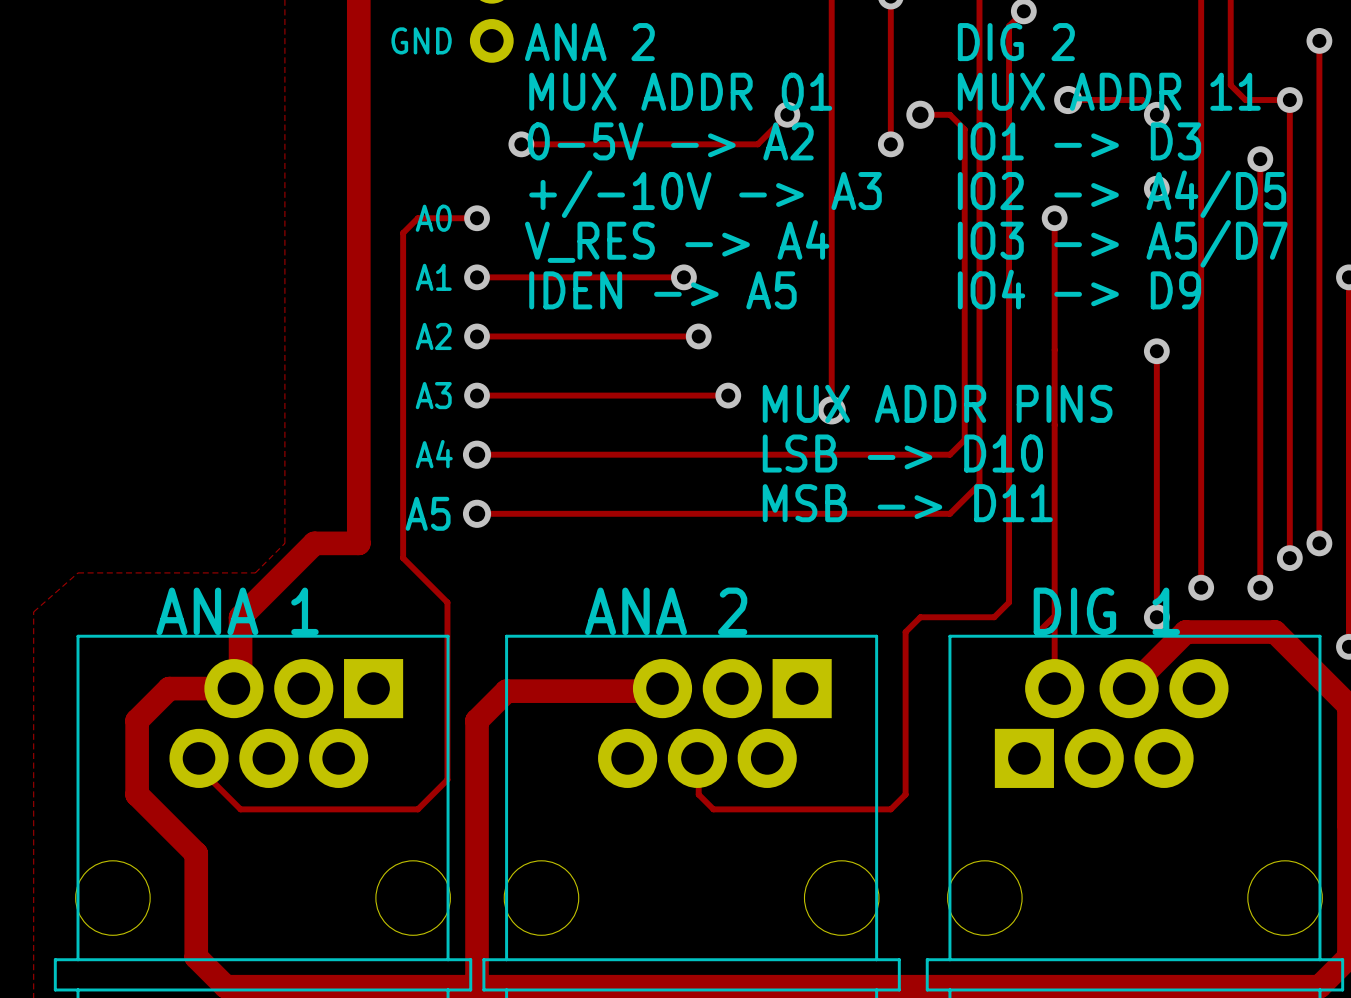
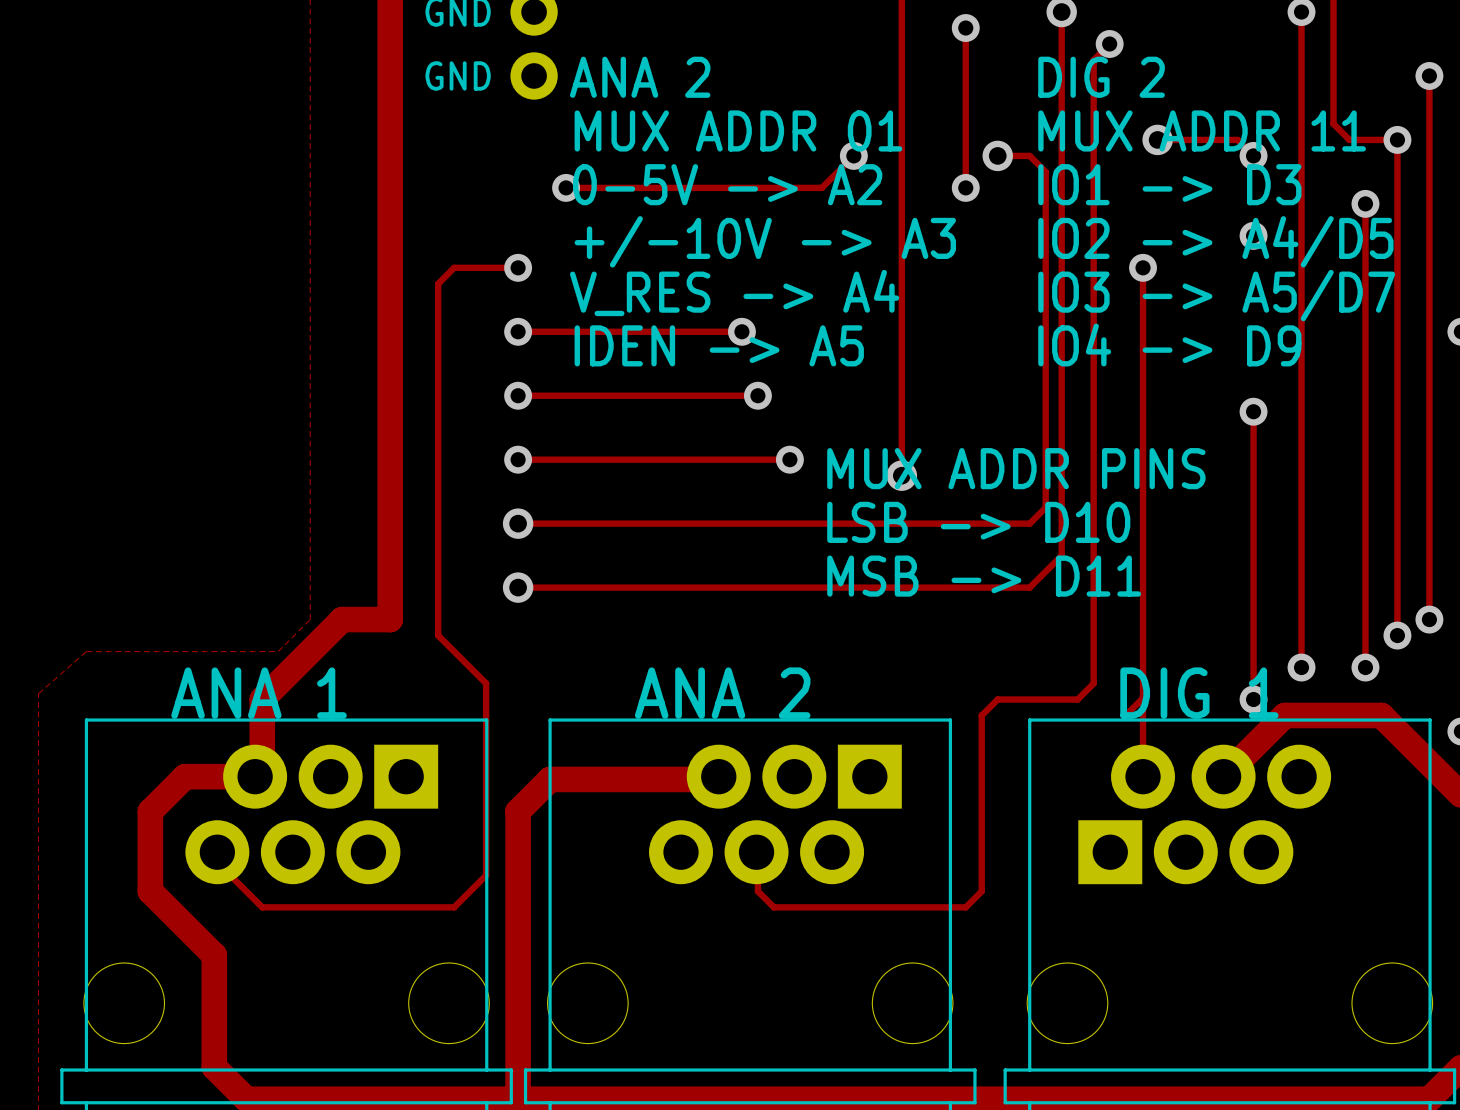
text: A0 (433, 218) -> none
text: A1 (433, 277) -> none
text: A2 (433, 336) -> none
text: A3 (433, 395) -> none
text: A4 (434, 454) -> none
text: A5 (428, 513) -> none

